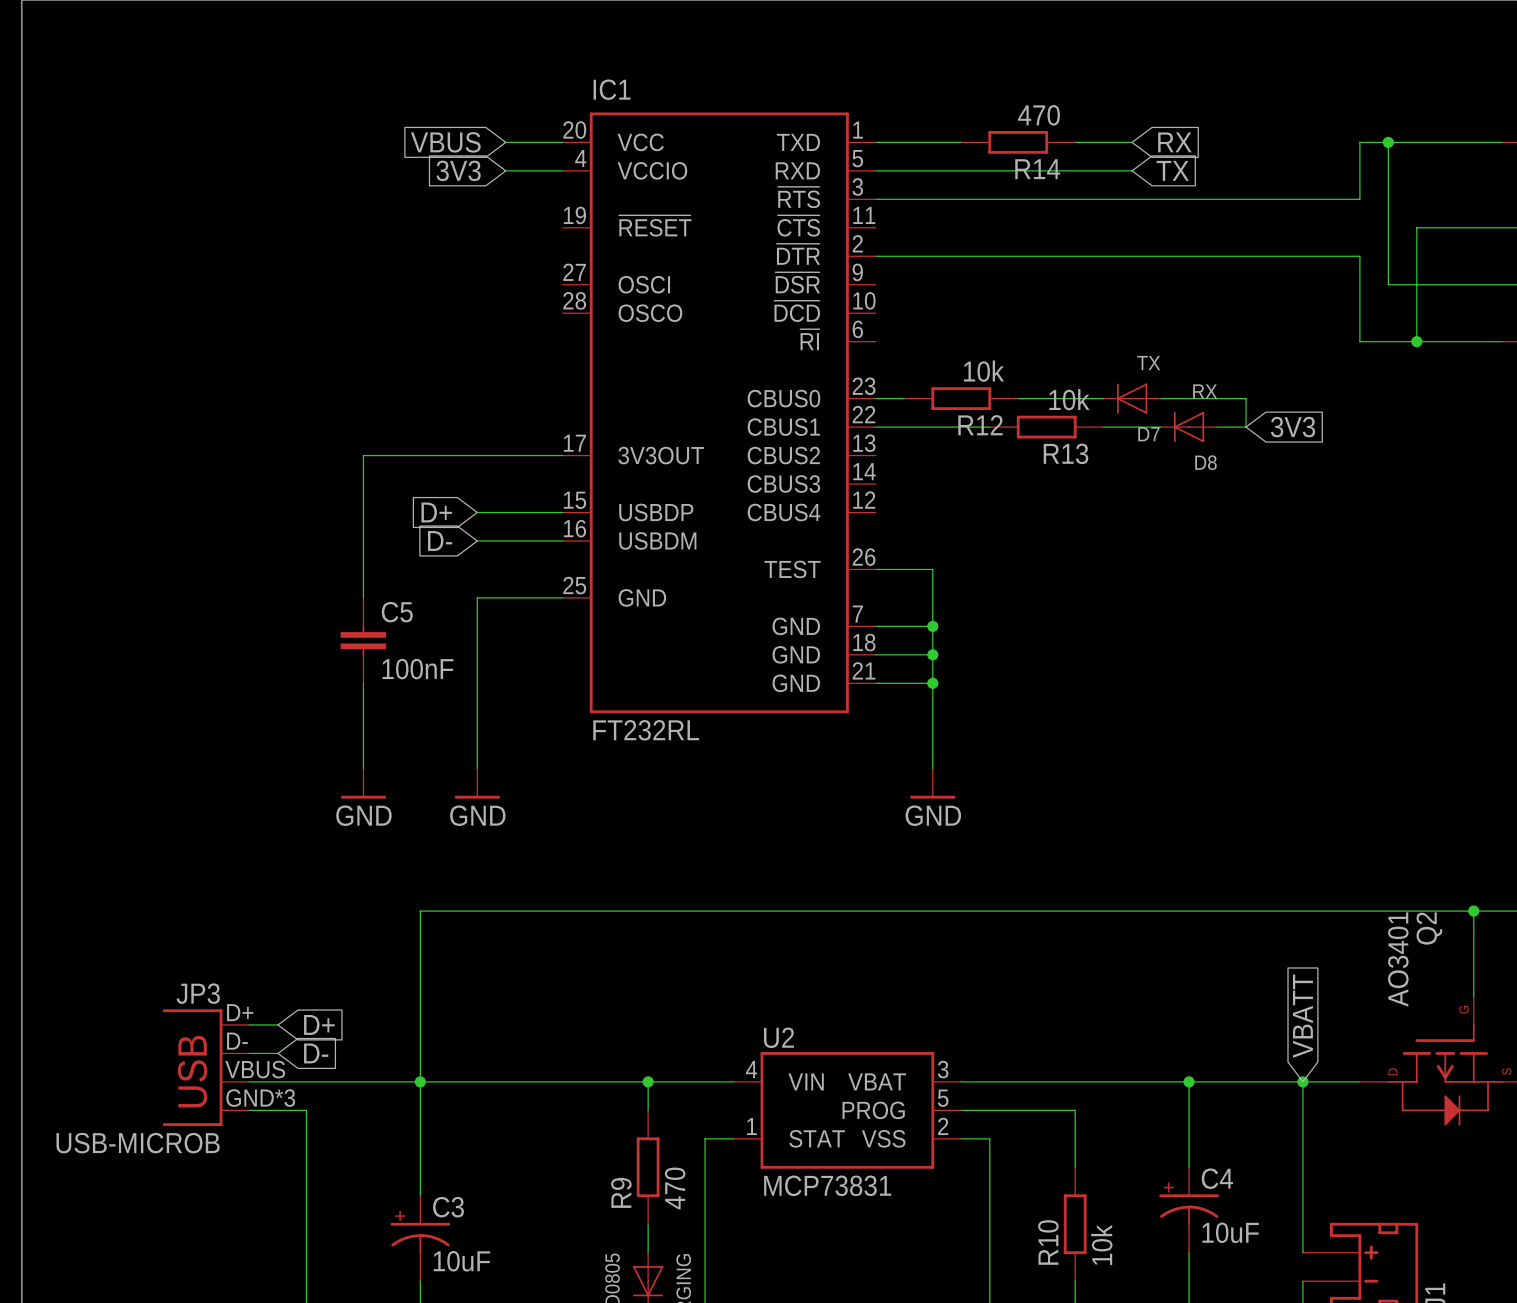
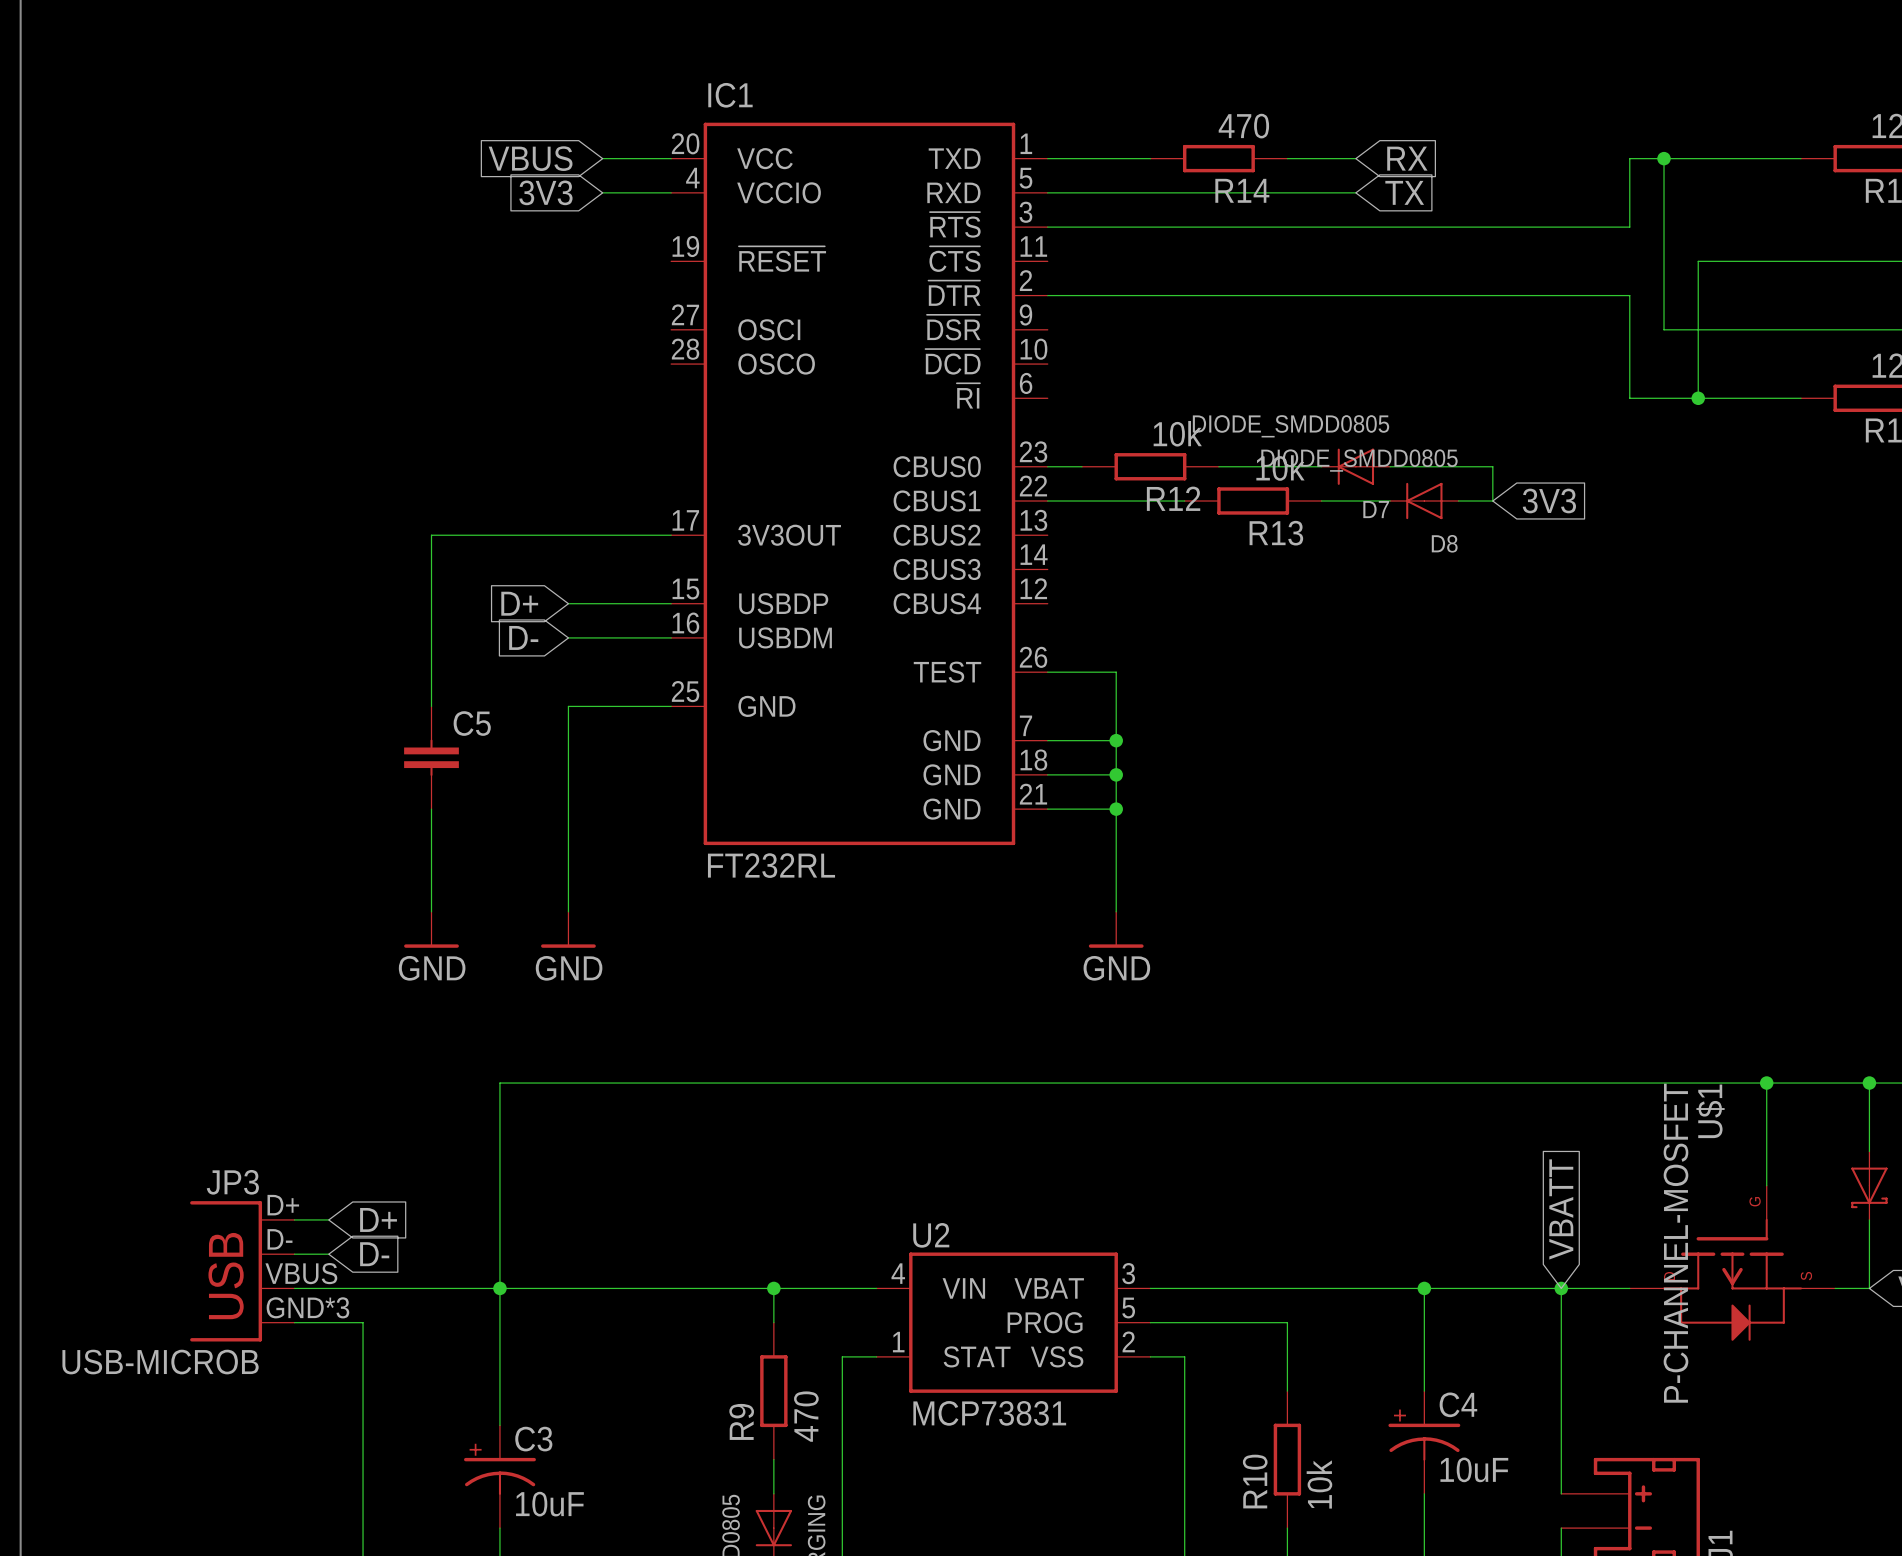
D7 value: TX (1148, 363) -> DIODE_SMDD0805 (1291, 426)
D8 value: RX (1205, 391) -> DIODE_SMDD0805 (1359, 460)
C5 value: 100nF (417, 669) -> none
Q2 name: Q2 (1429, 928) -> U$1 (1710, 1111)
Q2 value: AO3401 (1398, 959) -> P-CHANNEL-MOSFET (1675, 1243)

